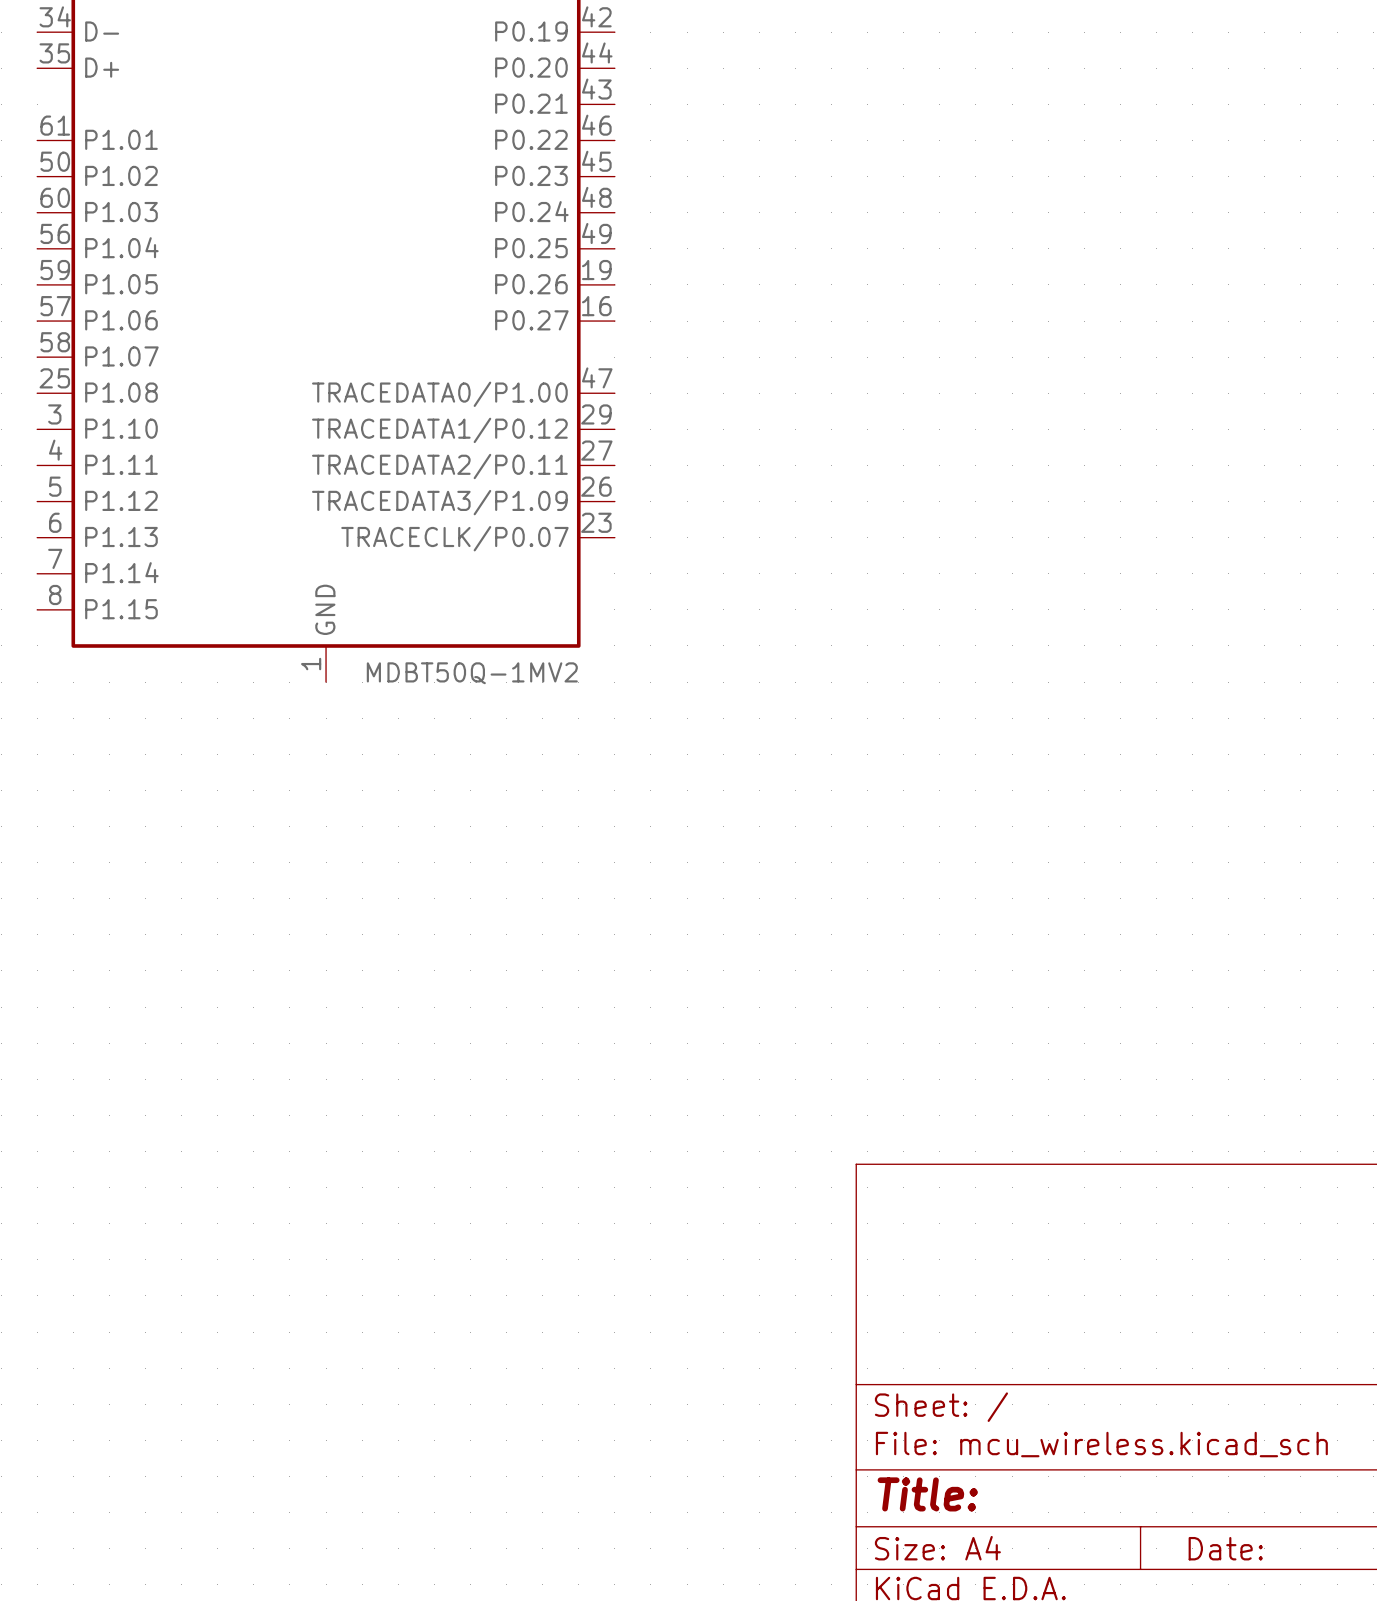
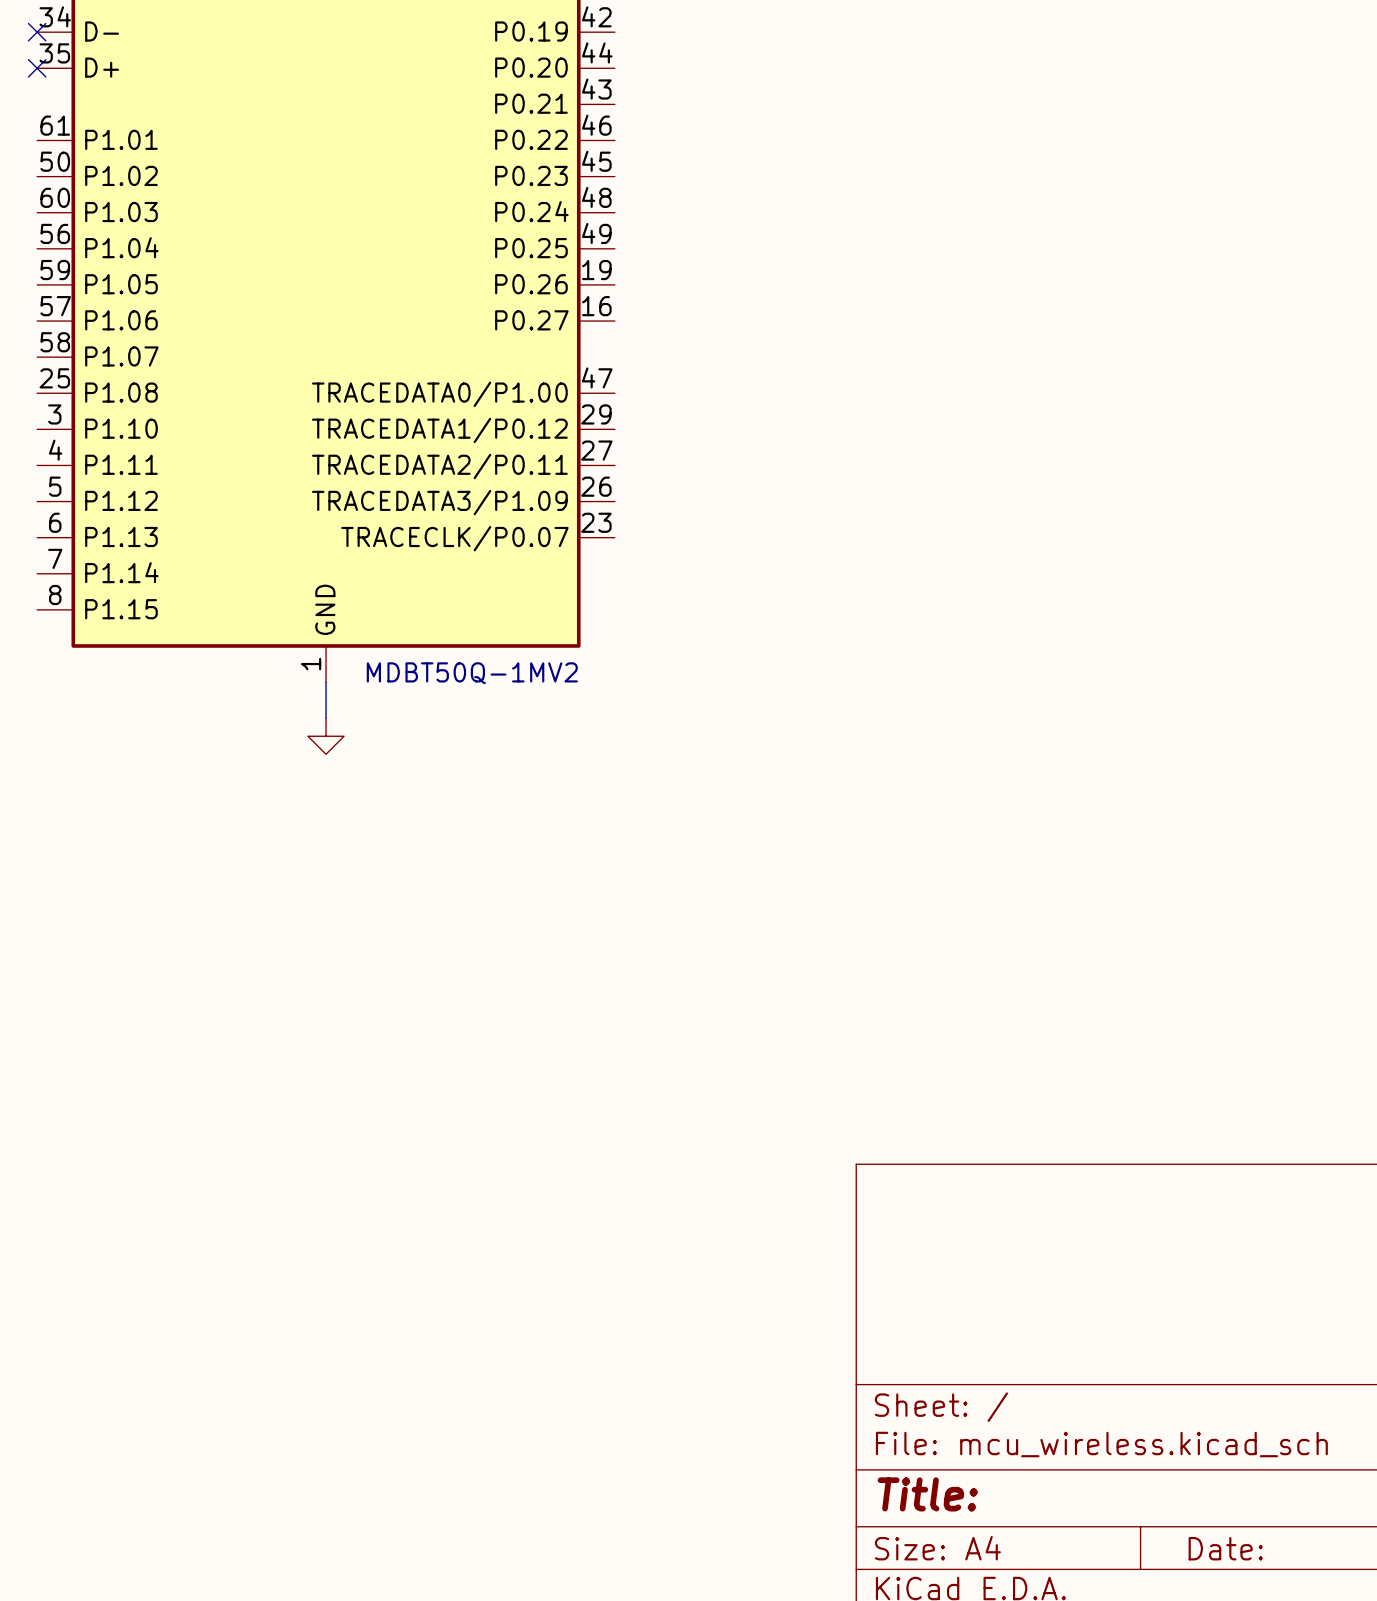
no-connect mark: none -> (37, 32)
no-connect mark: none -> (37, 68)
wire: none -> (326, 682) (326, 718)
power symbol: none -> (326, 736)

